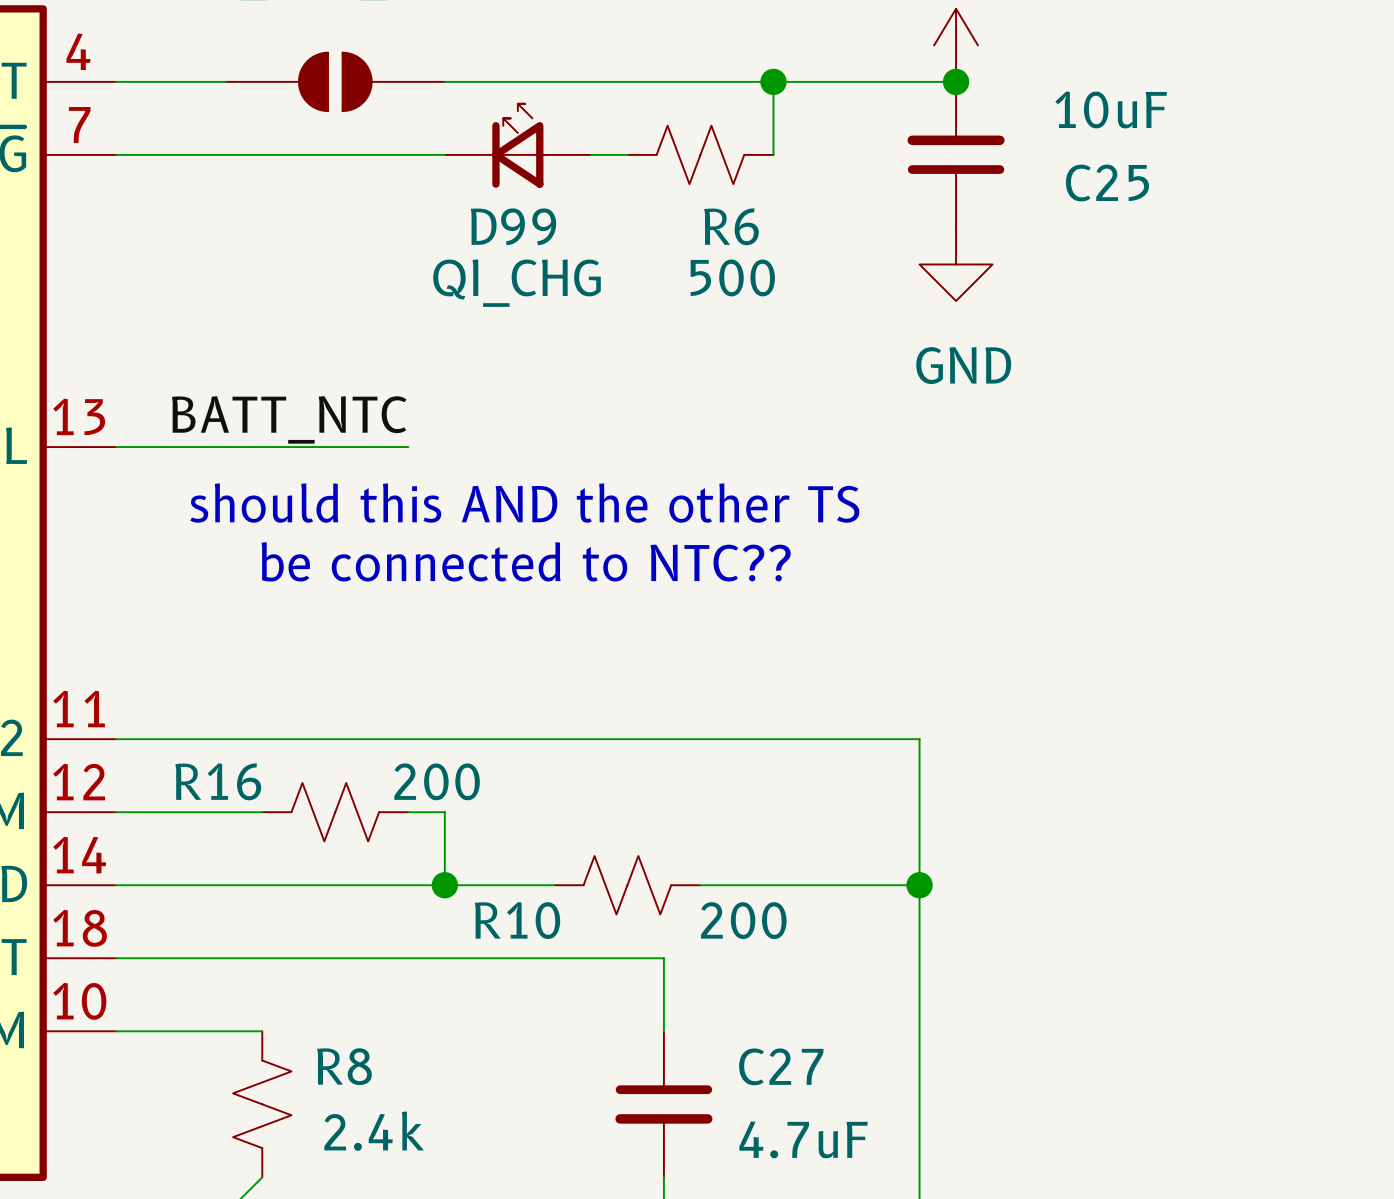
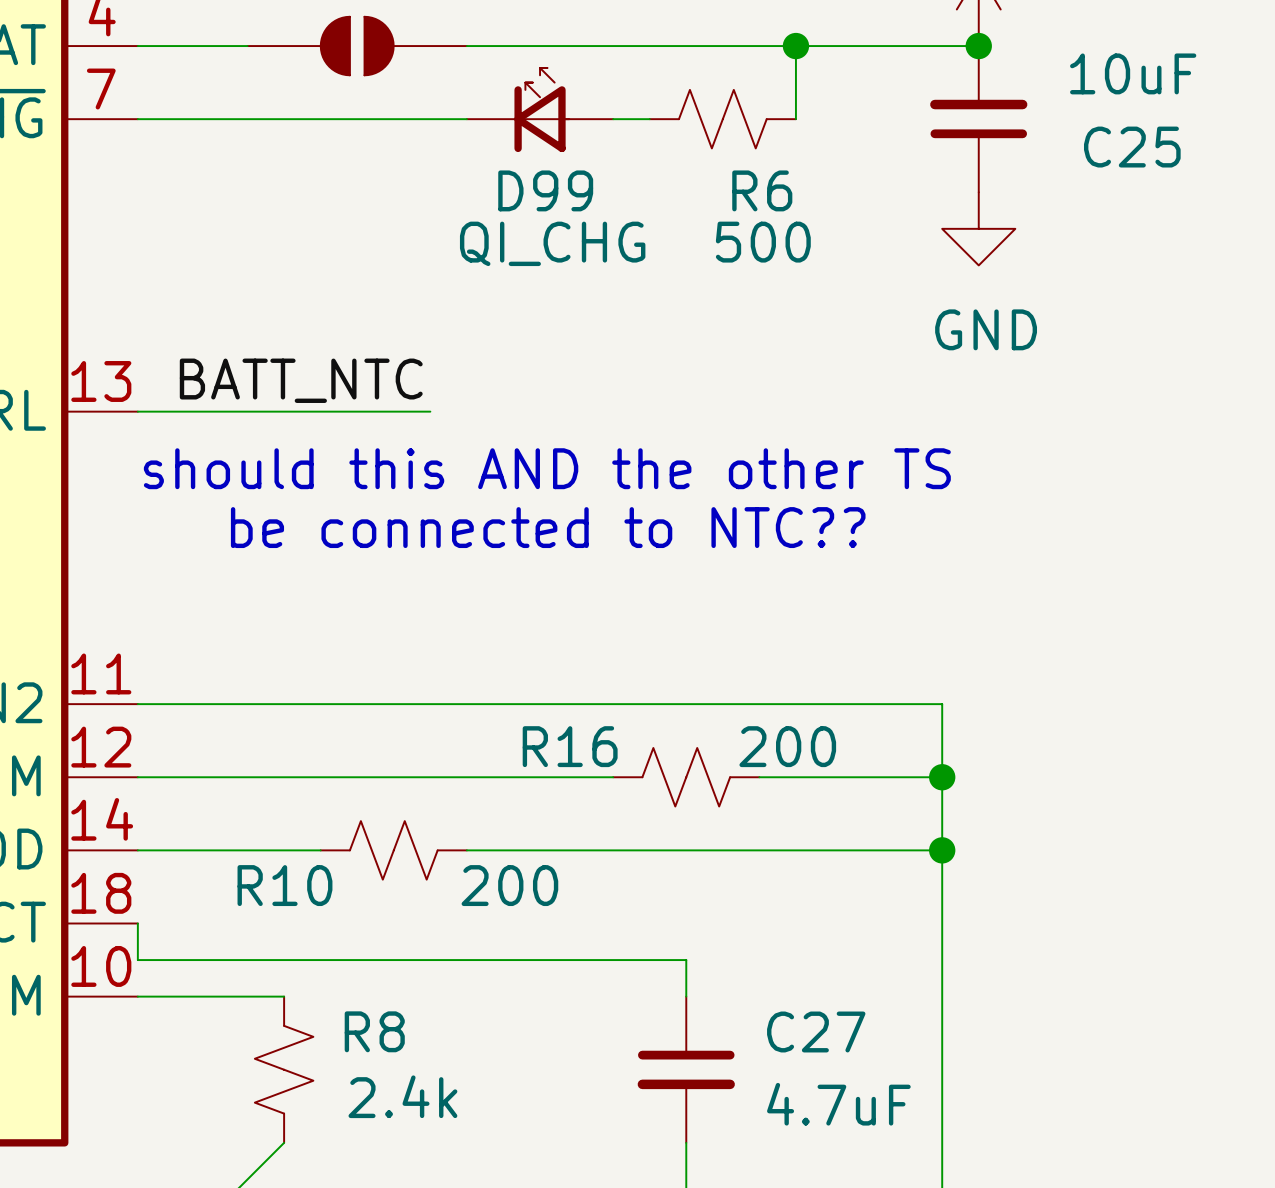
wire: none -> (284, 777) (430, 777)
R16 position: (335, 812) -> (686, 777)
wire: (444, 812) (444, 885) (298, 885) -> (466, 777) (613, 777)
wire: none -> (759, 777) (942, 777)
junction: none -> (942, 777)
junction: (444, 885) -> none
wire: none -> (576, 850) (722, 850)
R10 position: (627, 885) -> (393, 850)
wire: (116, 958) (663, 958) (663, 994) -> (137, 923) (137, 960) (686, 960)

